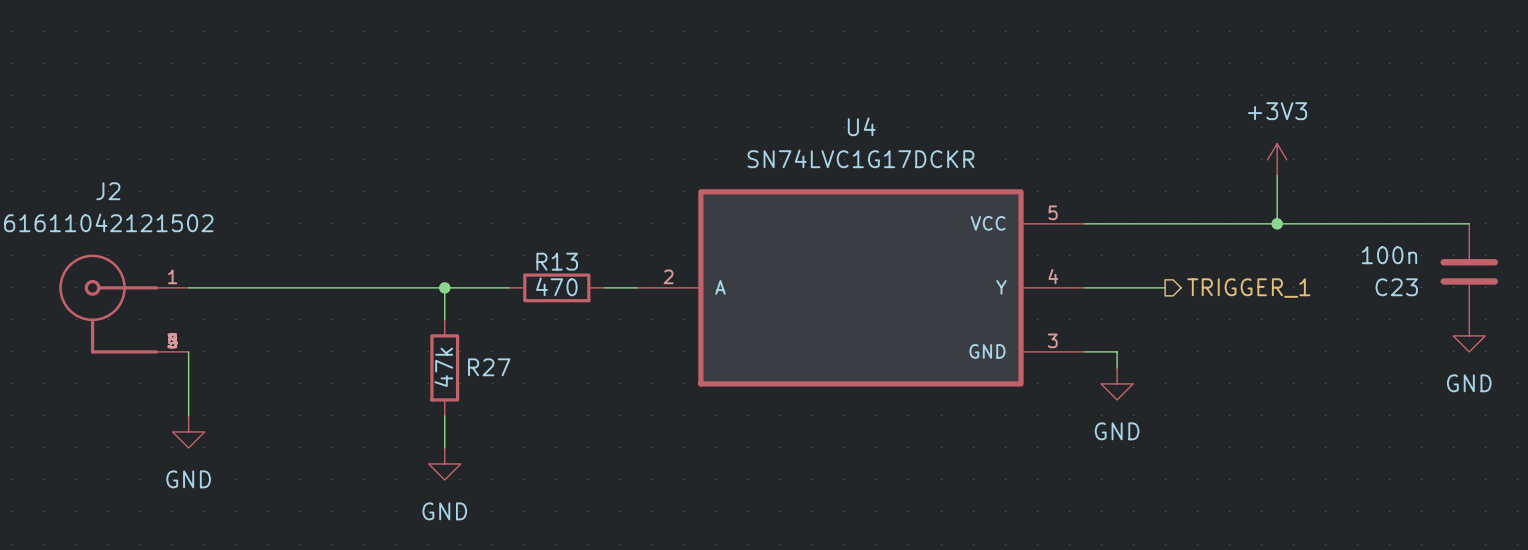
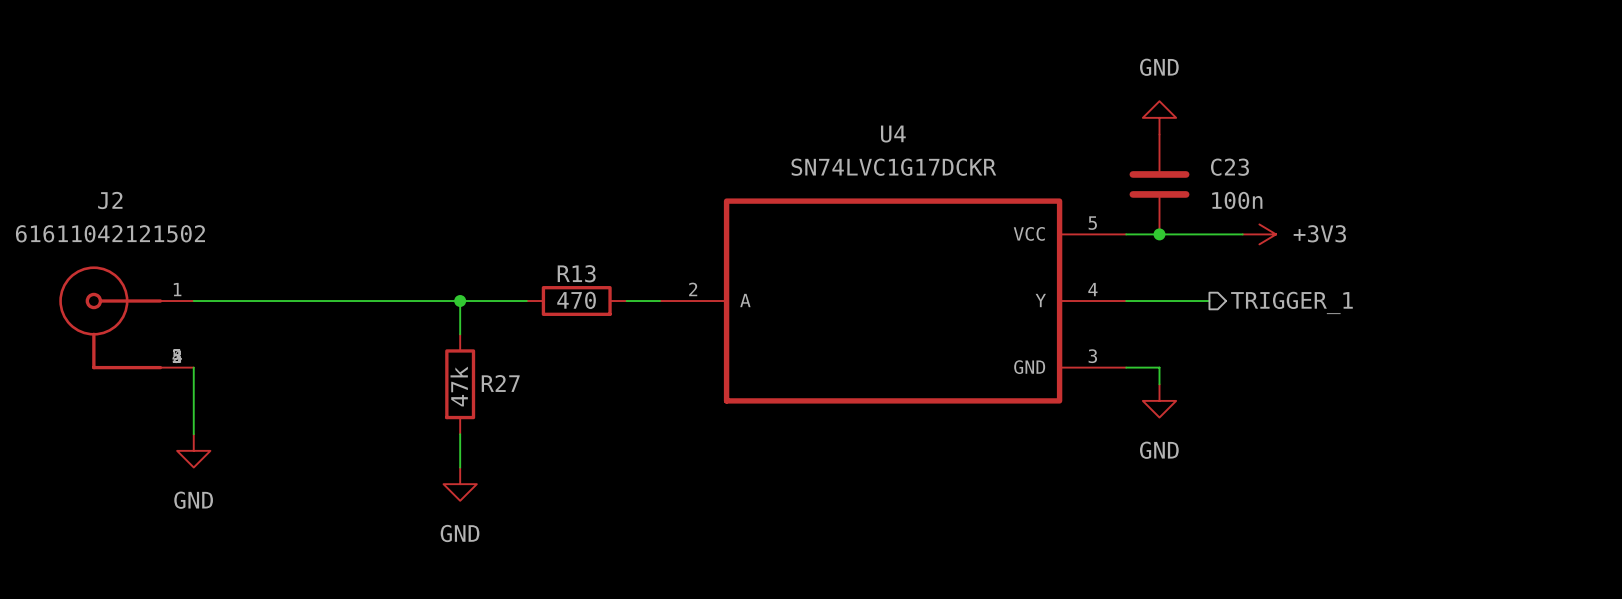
power symbol: none -> GND (1159, 117)
power symbol rotation: 0° (1277, 159) -> 90° clockwise (1259, 234)
power symbol position: +3V3 (1277, 159) -> +3V3 (1259, 234)
wire: (1277, 175) (1277, 223) -> none
junction: none -> (1159, 234)
wire: (1197, 223) (1469, 223) -> none
junction: (1277, 223) -> none
C23 value position: 100n (1389, 255) -> 100n (1237, 200)
C23 position: (1469, 271) -> (1159, 184)
C23 name position: C23 (1396, 287) -> C23 (1229, 167)
power symbol: GND (1469, 335) -> none

